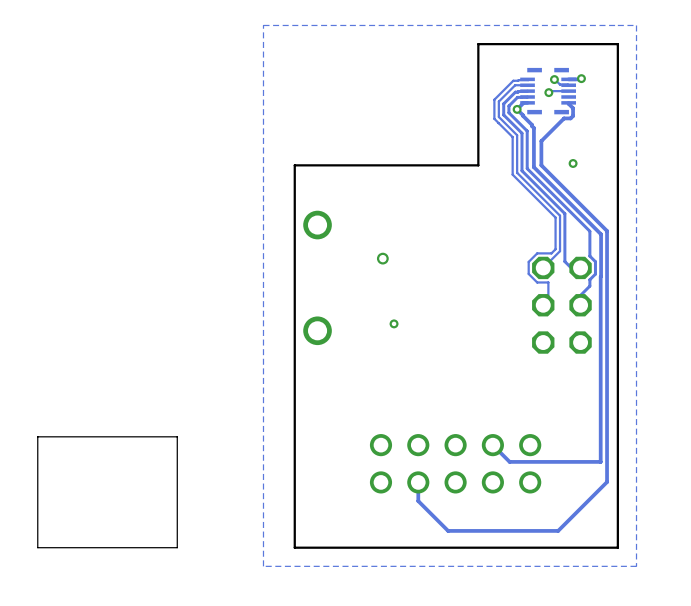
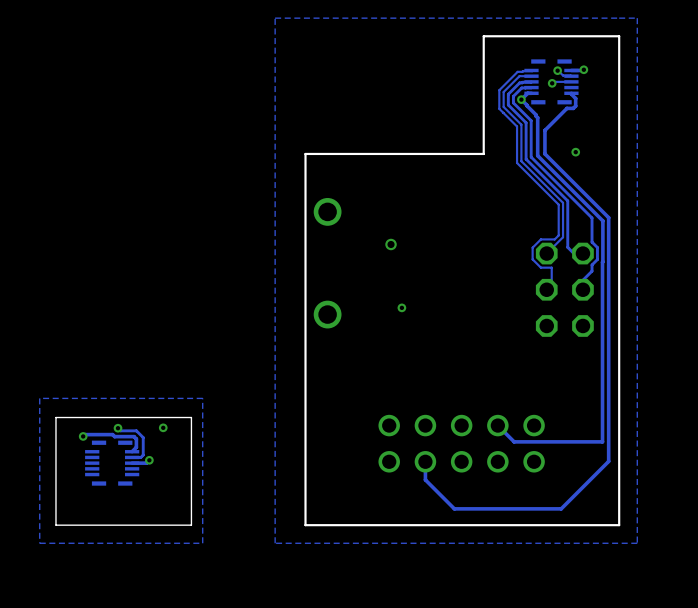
zone outline: none -> (202, 398) (39, 398) (39, 543) (202, 543) (202, 398)
track: none -> (118, 428) (120, 430) (136, 430) (143, 437) (143, 455) (140, 457) (132, 457)
via: none -> (118, 428)
via: none -> (163, 427)
track: none -> (83, 436) (85, 434) (112, 434) (114, 436) (134, 436) (136, 438) (136, 447) (132, 451)
via: none -> (83, 436)
track: none -> (149, 460) (146, 463) (132, 463)
via: none -> (149, 460)
part: none -> (112, 463)

